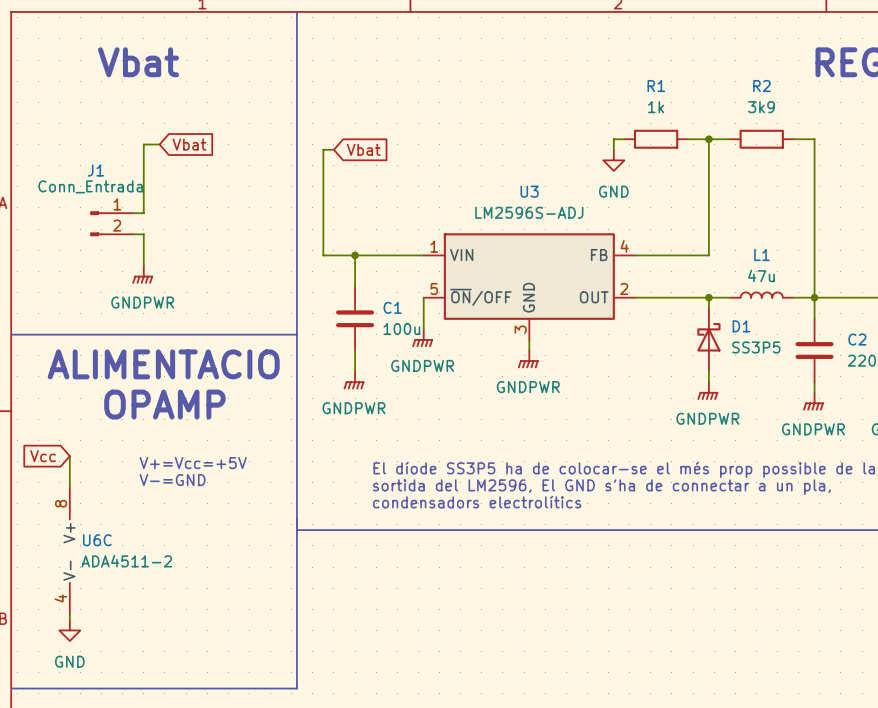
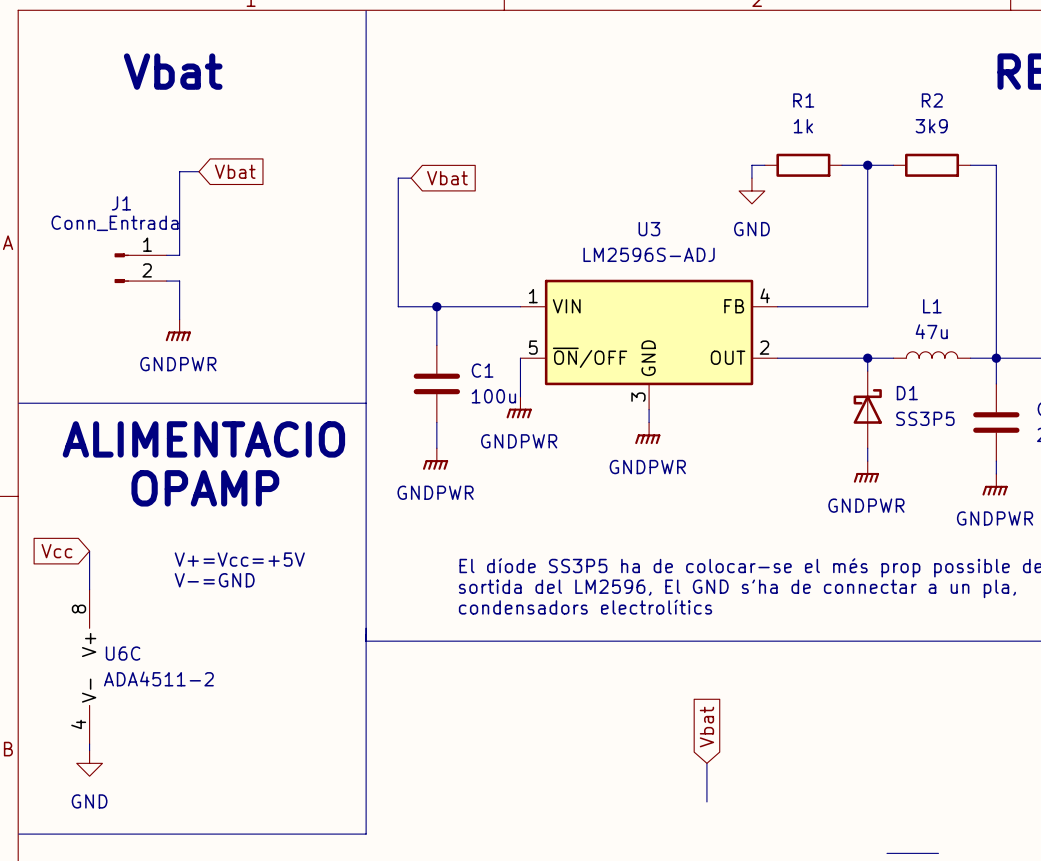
global label: none -> Vbat (706, 727)
wire: none -> (706, 763) (706, 801)
wire: none -> (887, 853) (938, 853)

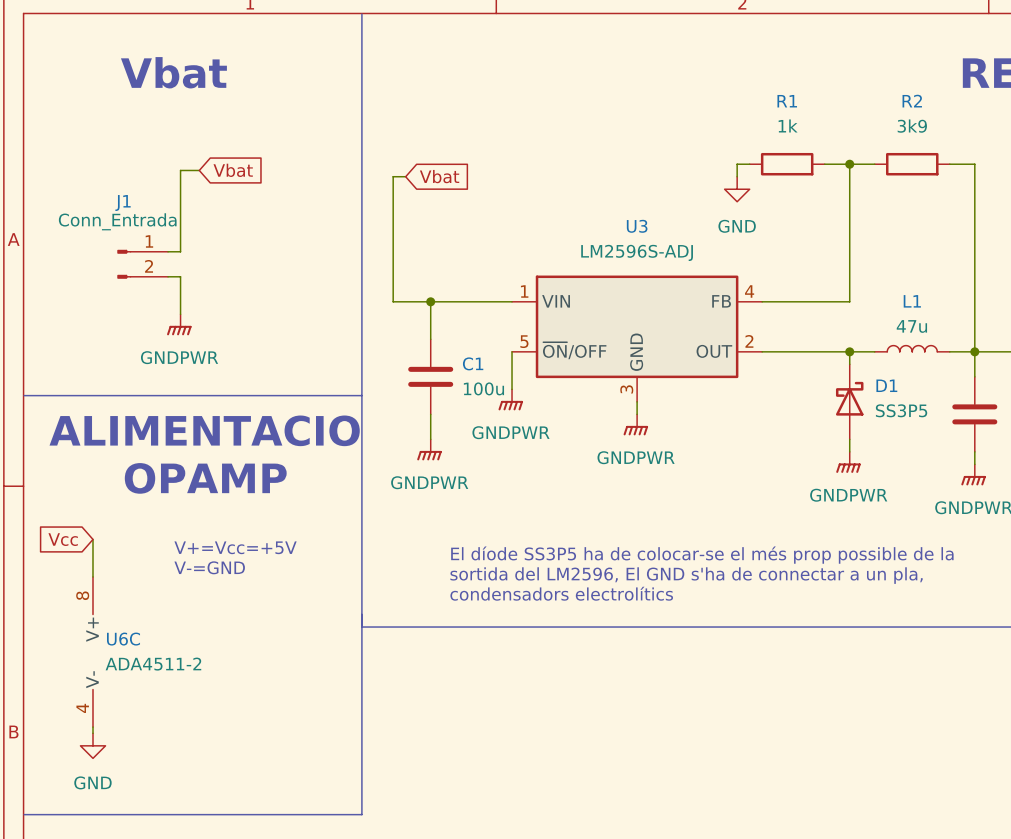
global label: Vbat (706, 727) -> none
wire: (706, 763) (706, 801) -> none
wire: (887, 853) (938, 853) -> none

